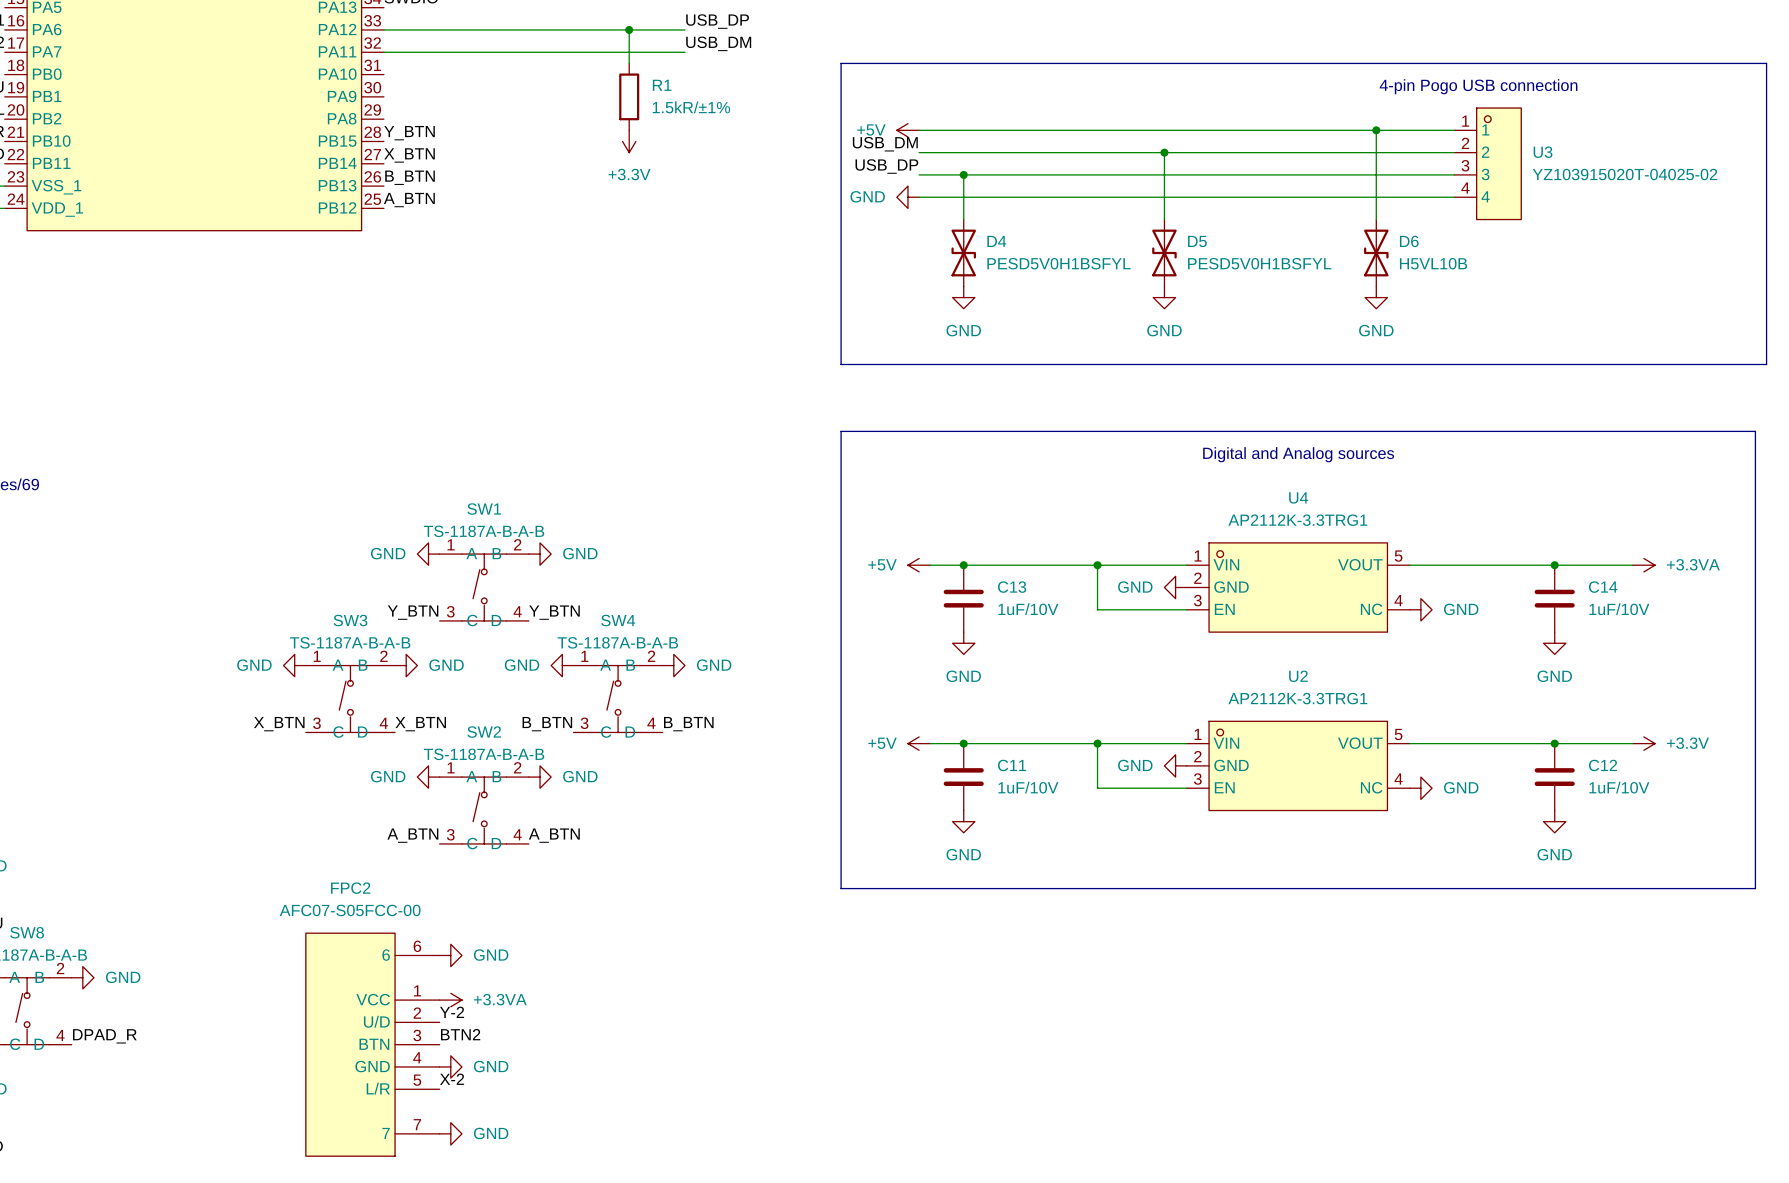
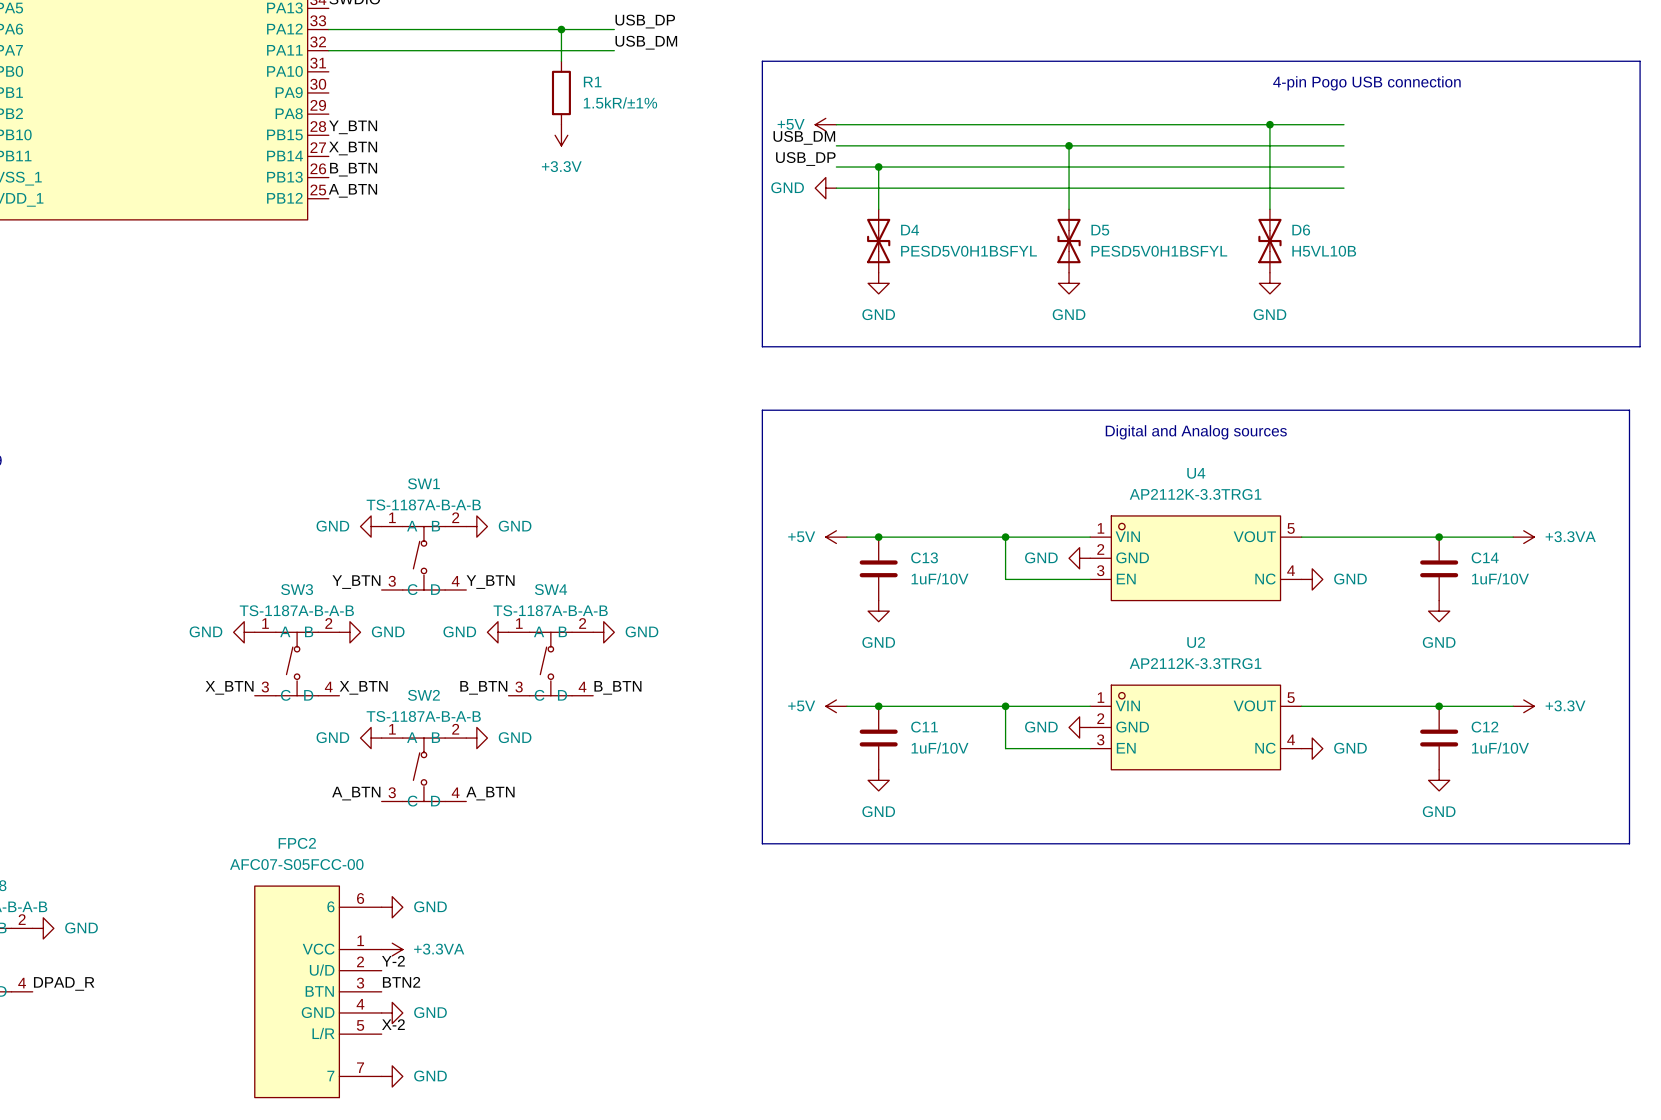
U3: YZ103915020T-04025-02 (1487, 163) -> none

